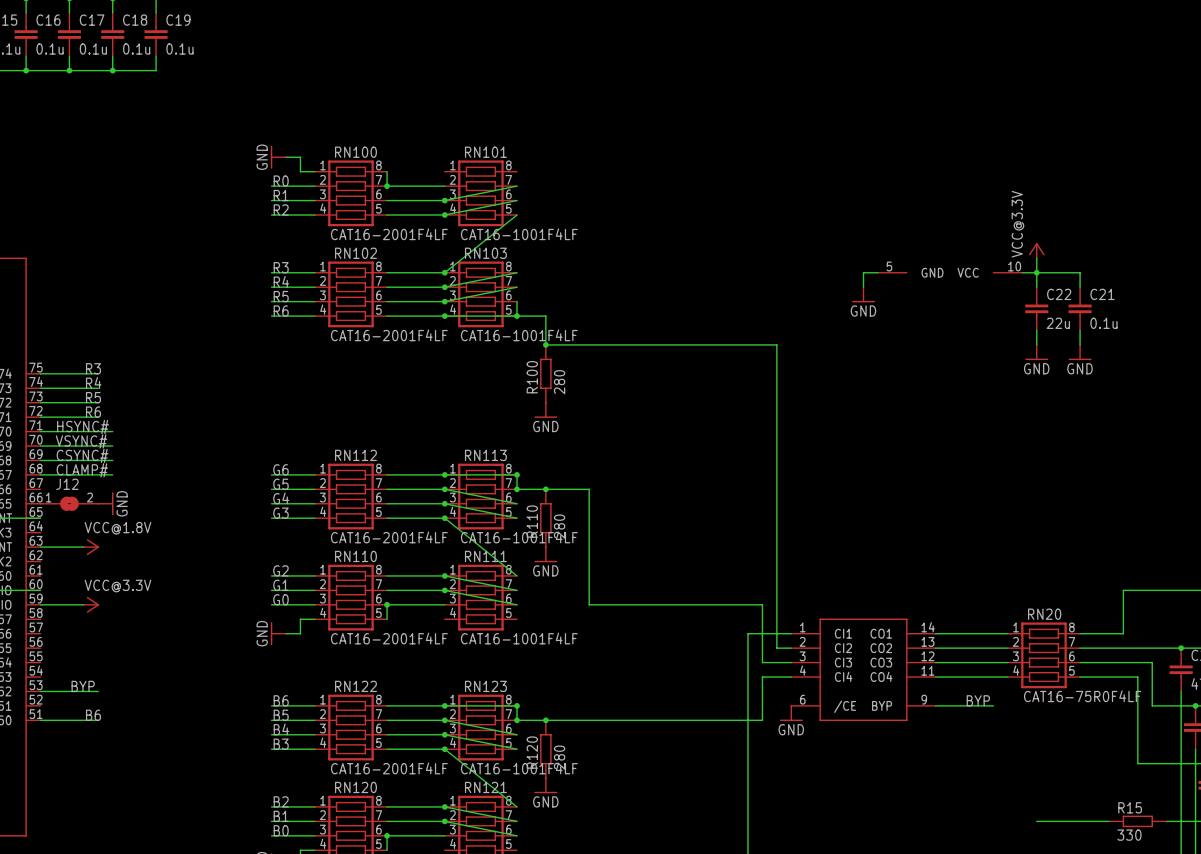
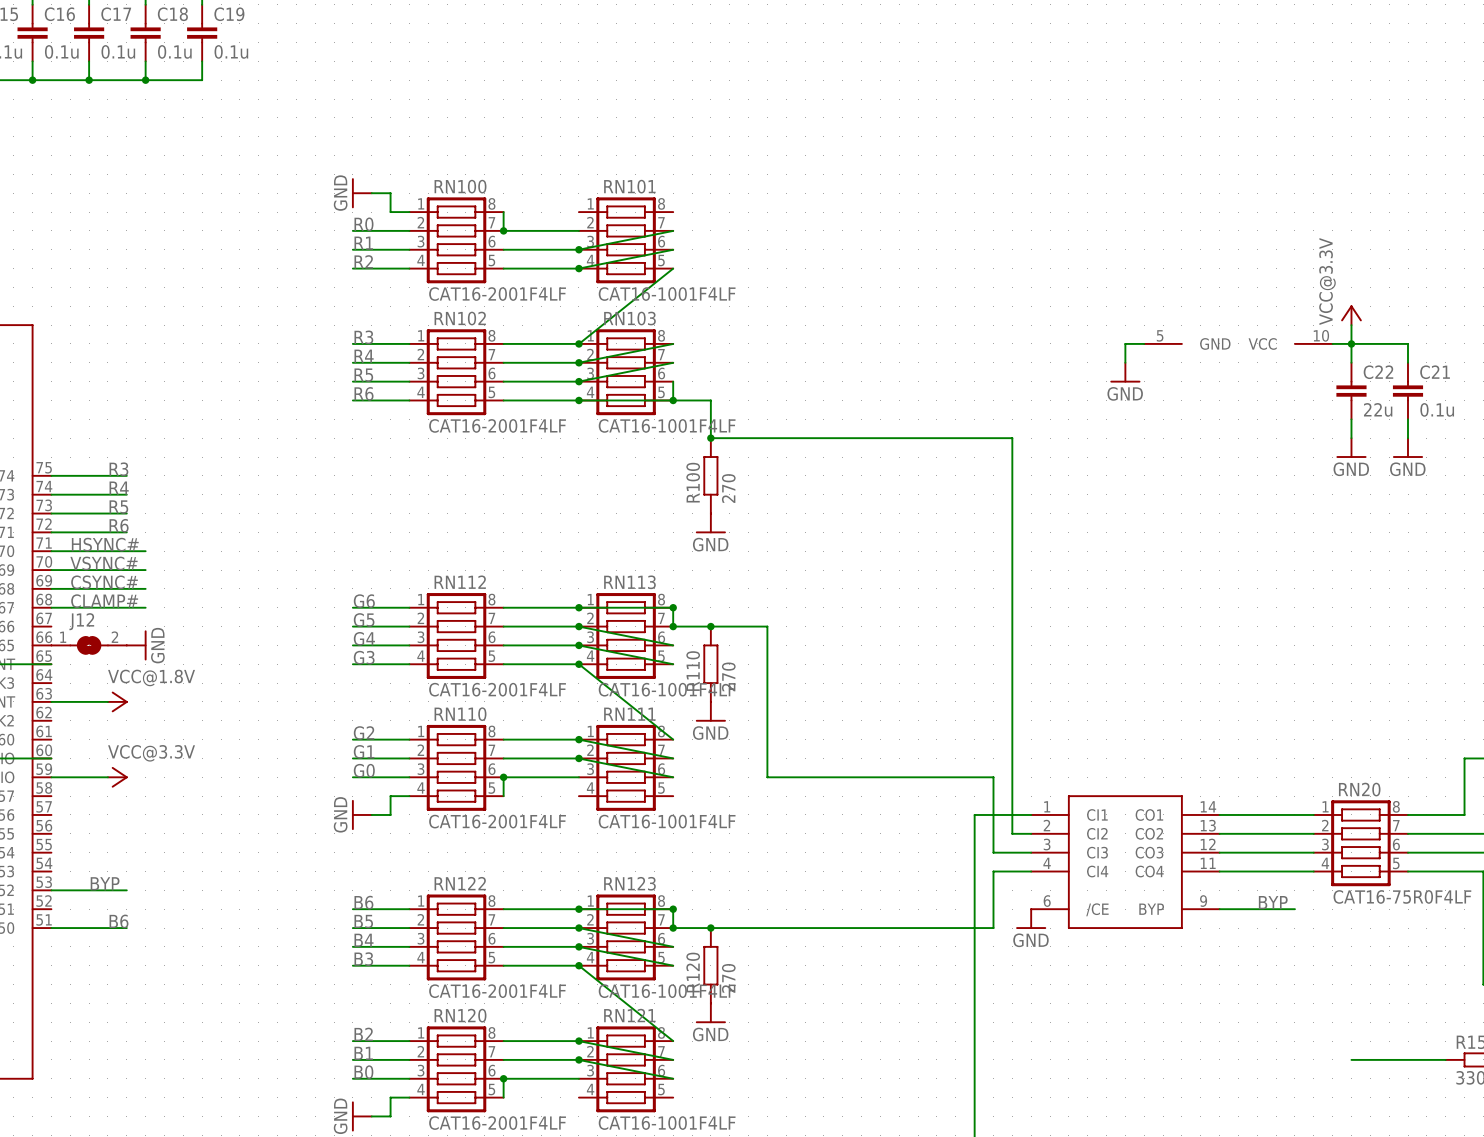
R100 value: 280 (559, 382) -> 270 (728, 488)
R110 value: 280 (559, 526) -> 270 (728, 676)
R120 value: 280 (559, 757) -> 270 (728, 978)

